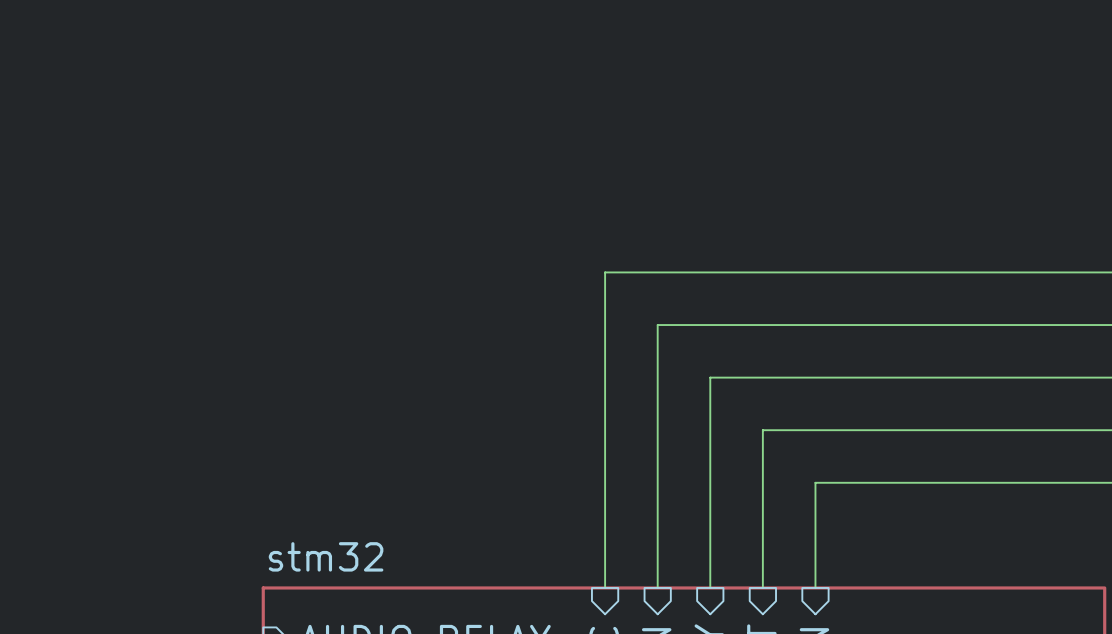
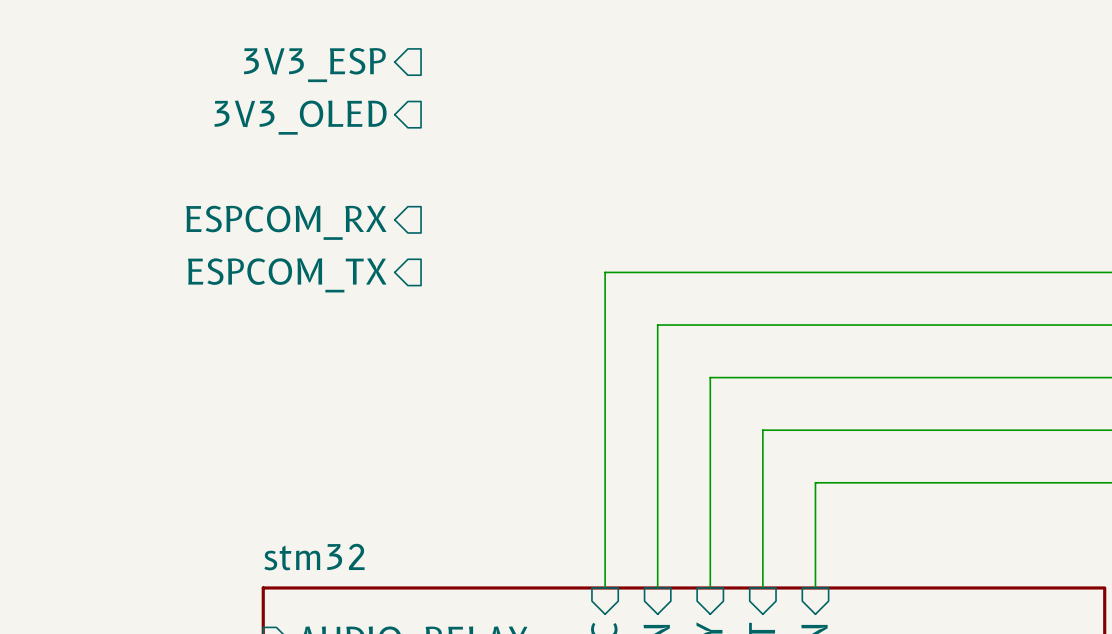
sheet pin: none -> 3V3_ESP (314, 65)
sheet pin: none -> 3V3_OLED (300, 117)
sheet pin: none -> ESPCOM_RX (286, 222)
sheet pin: none -> ESPCOM_TX (287, 275)

